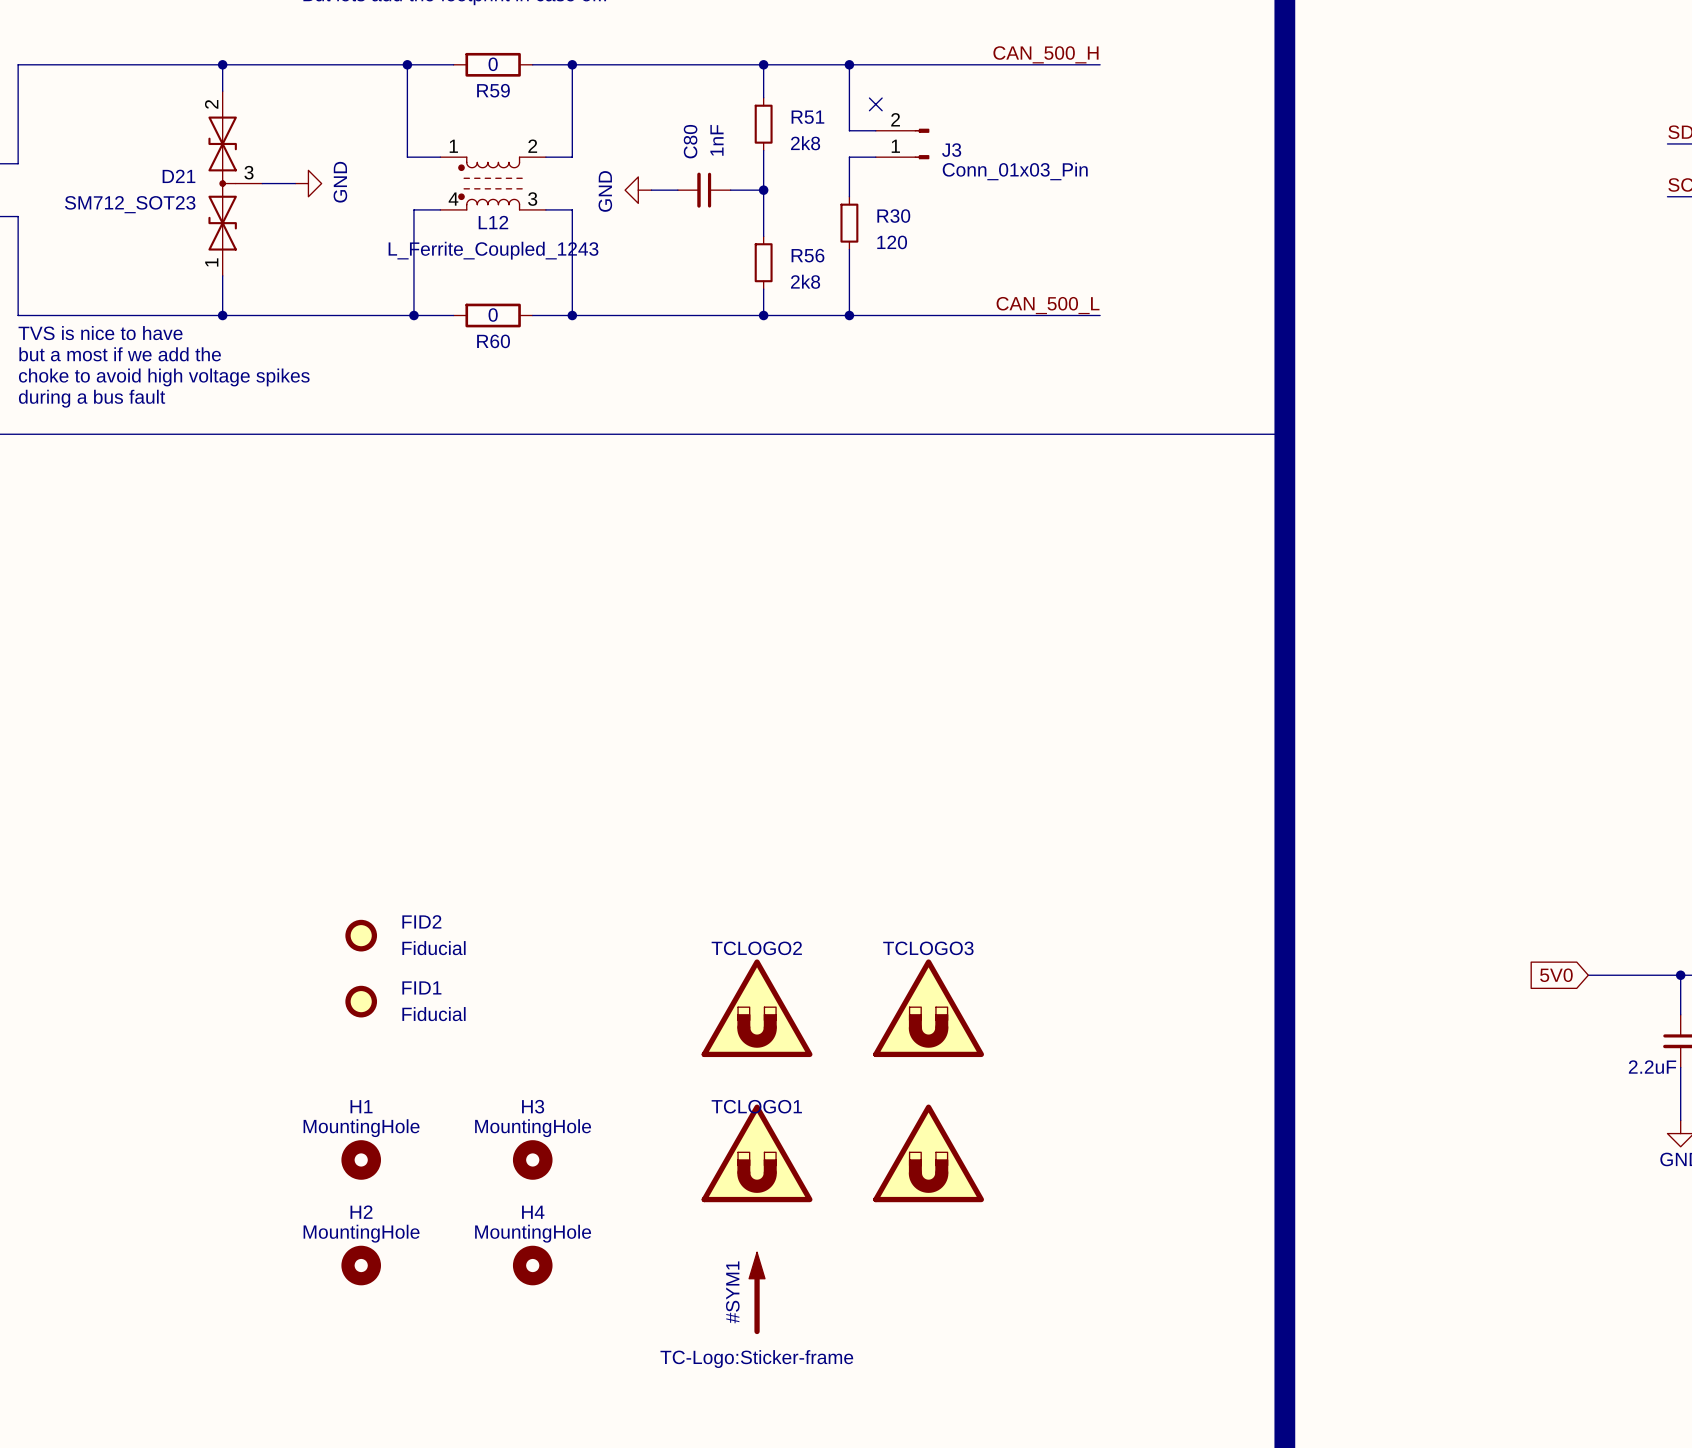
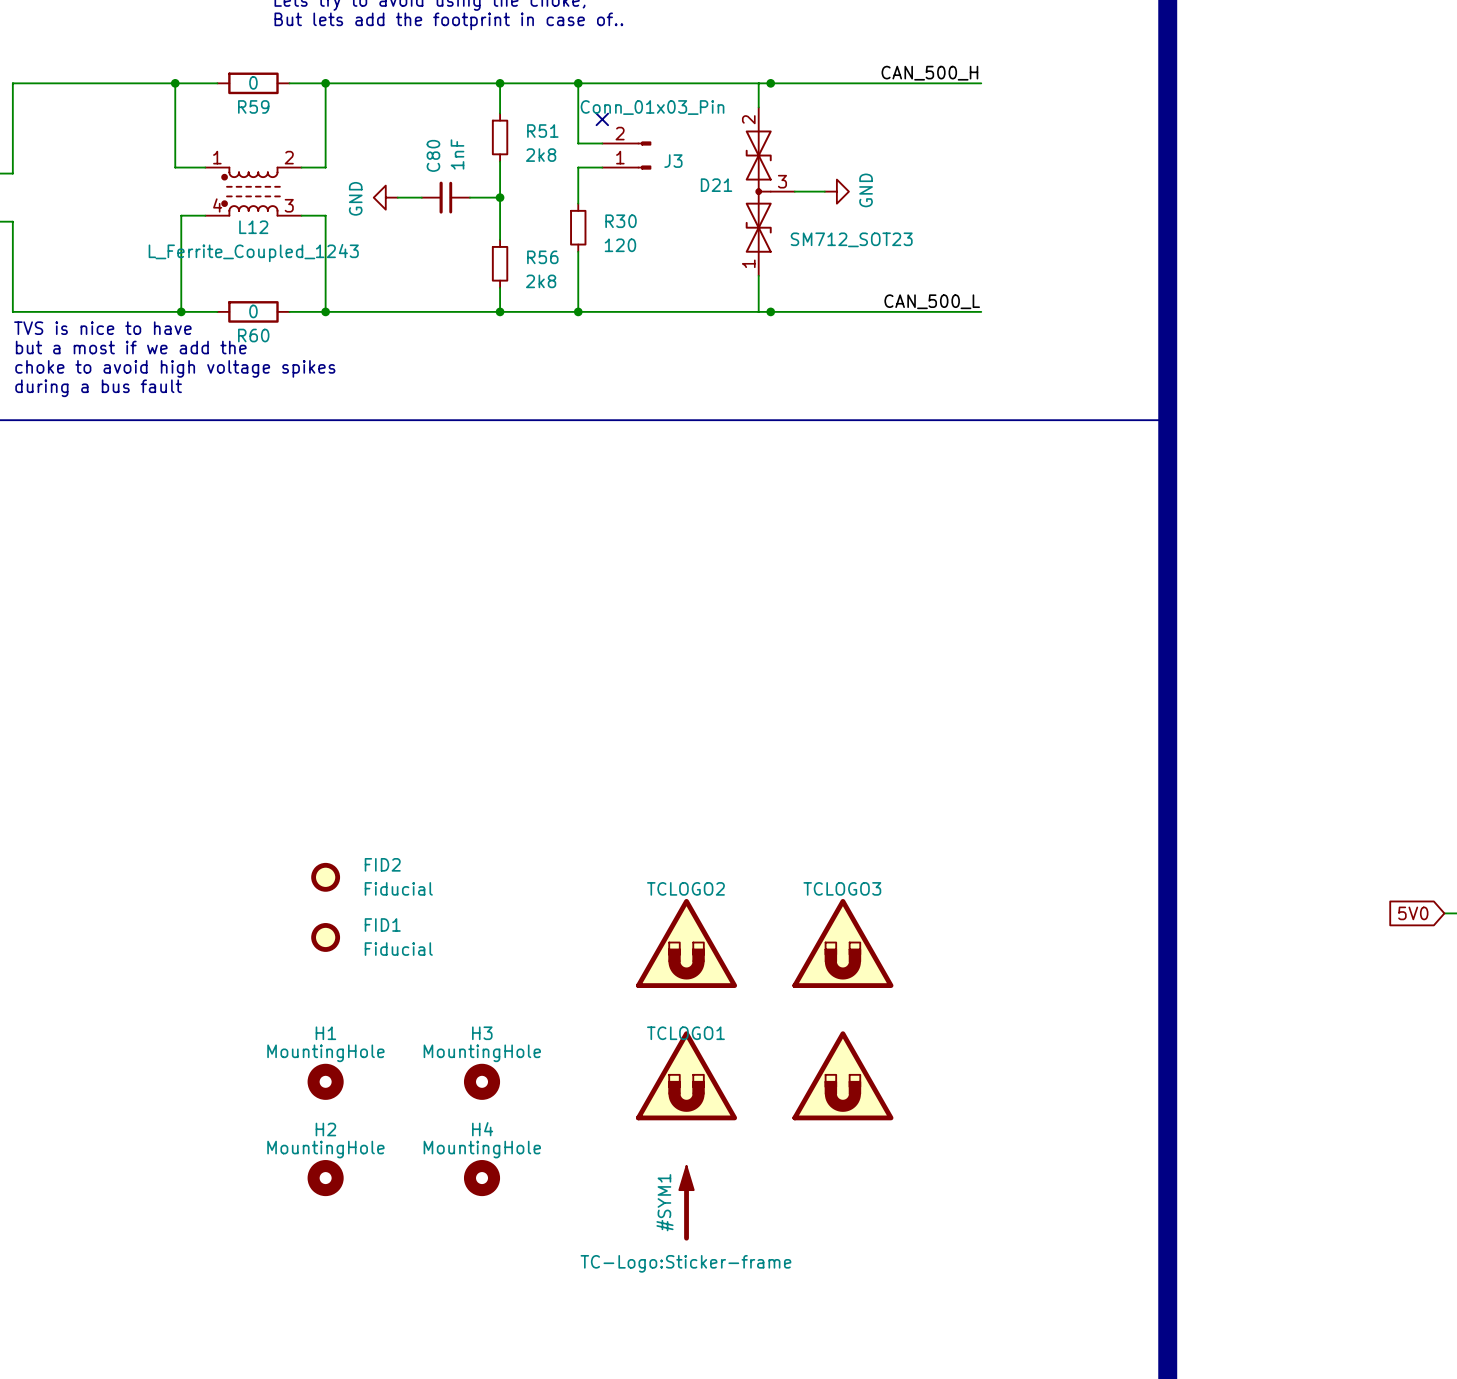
label position: CAN_500_H (1045, 54) -> CAN_500_H (929, 73)
wire: (222, 64) (222, 91) -> none
junction position: (222, 64) -> (175, 83)
wire: (242, 64) (321, 64) -> (409, 83) (482, 83)
wire: (407, 64) (407, 157) (440, 157) -> (175, 83) (175, 167) (205, 167)
junction position: (407, 64) -> (325, 83)
R59 position: (493, 64) -> (253, 83)
wire: (572, 64) (572, 157) (545, 157) -> (325, 83) (325, 167) (301, 167)
junction position: (572, 64) -> (500, 83)
junction: none -> (578, 83)
wire: (763, 64) (763, 97) -> (500, 83) (500, 113)
junction: (763, 64) -> none
wire: none -> (758, 83) (758, 107)
wire: (849, 64) (849, 130) (875, 130) -> (578, 83) (578, 143) (602, 143)
wire: (1080, 64) (1100, 64) -> none
no-connect mark: none -> (602, 119)
no-connect mark: (875, 104) -> none
R51 position: (763, 124) -> (500, 137)
J3 position: (902, 143) -> (626, 155)
wire: (763, 150) (763, 236) -> (500, 161) (500, 239)
wire: (875, 157) (849, 157) (849, 196) -> (602, 167) (578, 167) (578, 203)
J3 value position: Conn_01x03_Pin (1015, 171) -> Conn_01x03_Pin (652, 107)
D21 position: (235, 183) -> (770, 191)
wire: (262, 183) (295, 183) -> none
power symbol: GND (308, 183) -> none
L12 position: (493, 183) -> (253, 191)
wire: none -> (794, 191) (824, 191)
power symbol: none -> GND (836, 191)
power symbol: none -> GND (385, 197)
junction: none -> (500, 197)
power symbol: GND (638, 190) -> none
wire: (651, 190) (677, 190) -> (397, 197) (421, 197)
C80 position: (704, 190) -> (445, 197)
wire: (730, 190) (763, 190) -> (469, 197) (500, 197)
junction: (763, 190) -> none
D21 value position: SM712_SOT23 (130, 204) -> SM712_SOT23 (851, 239)
wire: (440, 209) (413, 209) (413, 315) -> (205, 215) (181, 215) (181, 311)
wire: (545, 209) (572, 209) (572, 315) -> (301, 215) (325, 215) (325, 311)
R30 position: (849, 223) -> (578, 227)
wire: (849, 249) (849, 315) -> (578, 251) (578, 311)
R56 position: (763, 262) -> (500, 263)
wire: (222, 275) (222, 315) -> none
wire: none -> (758, 275) (758, 311)
wire: (763, 289) (763, 315) -> (500, 287) (500, 311)
label position: CAN_500_L (1048, 305) -> CAN_500_L (932, 301)
junction position: (222, 315) -> (181, 311)
wire: (242, 315) (321, 315) -> (409, 311) (482, 311)
junction position: (413, 315) -> (325, 311)
R60 position: (493, 315) -> (253, 311)
junction position: (572, 315) -> (500, 311)
junction: none -> (578, 311)
junction: (763, 315) -> none
wire: (1080, 315) (1100, 315) -> none

